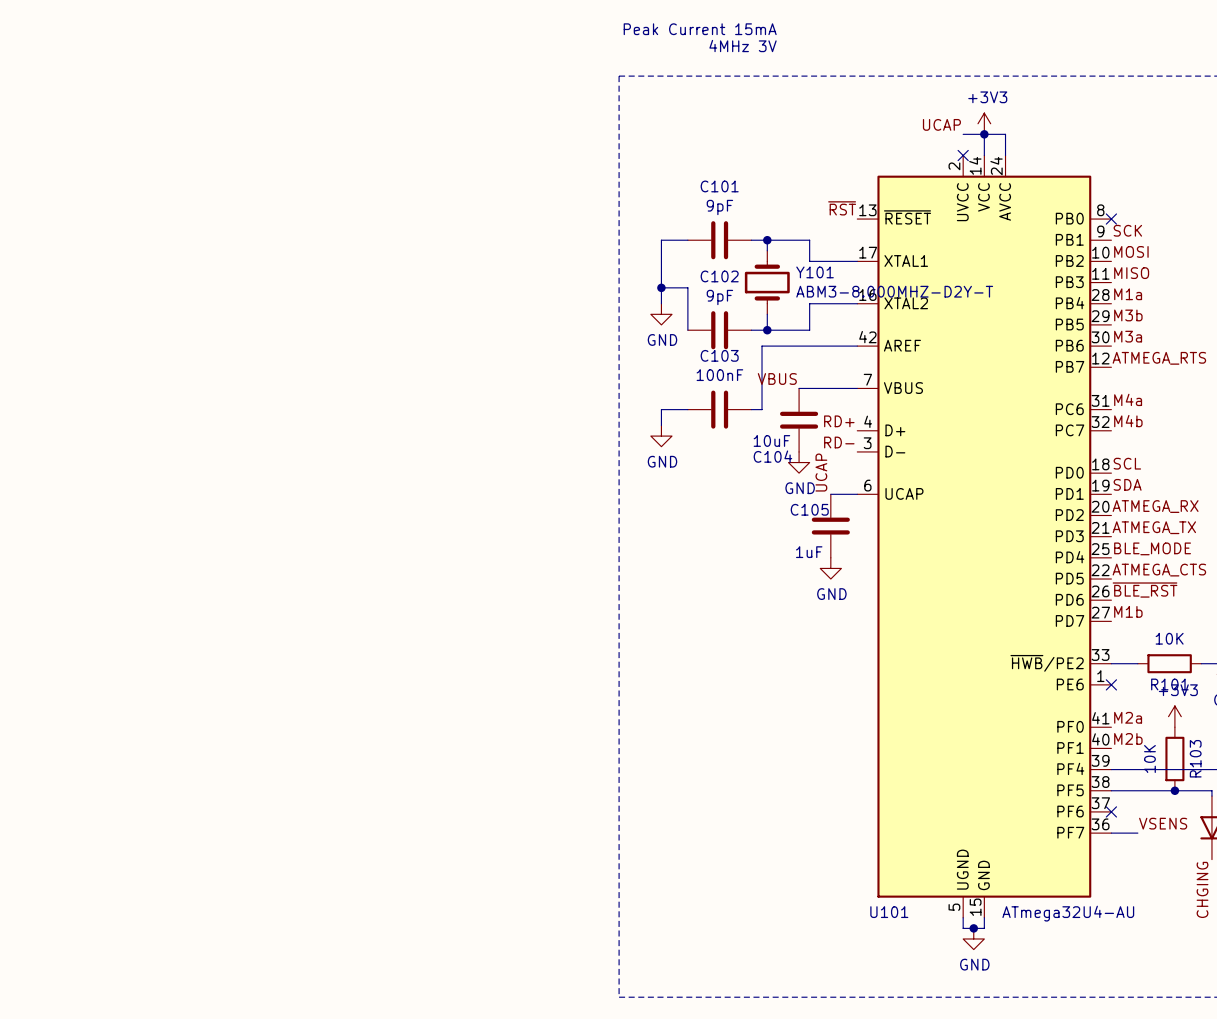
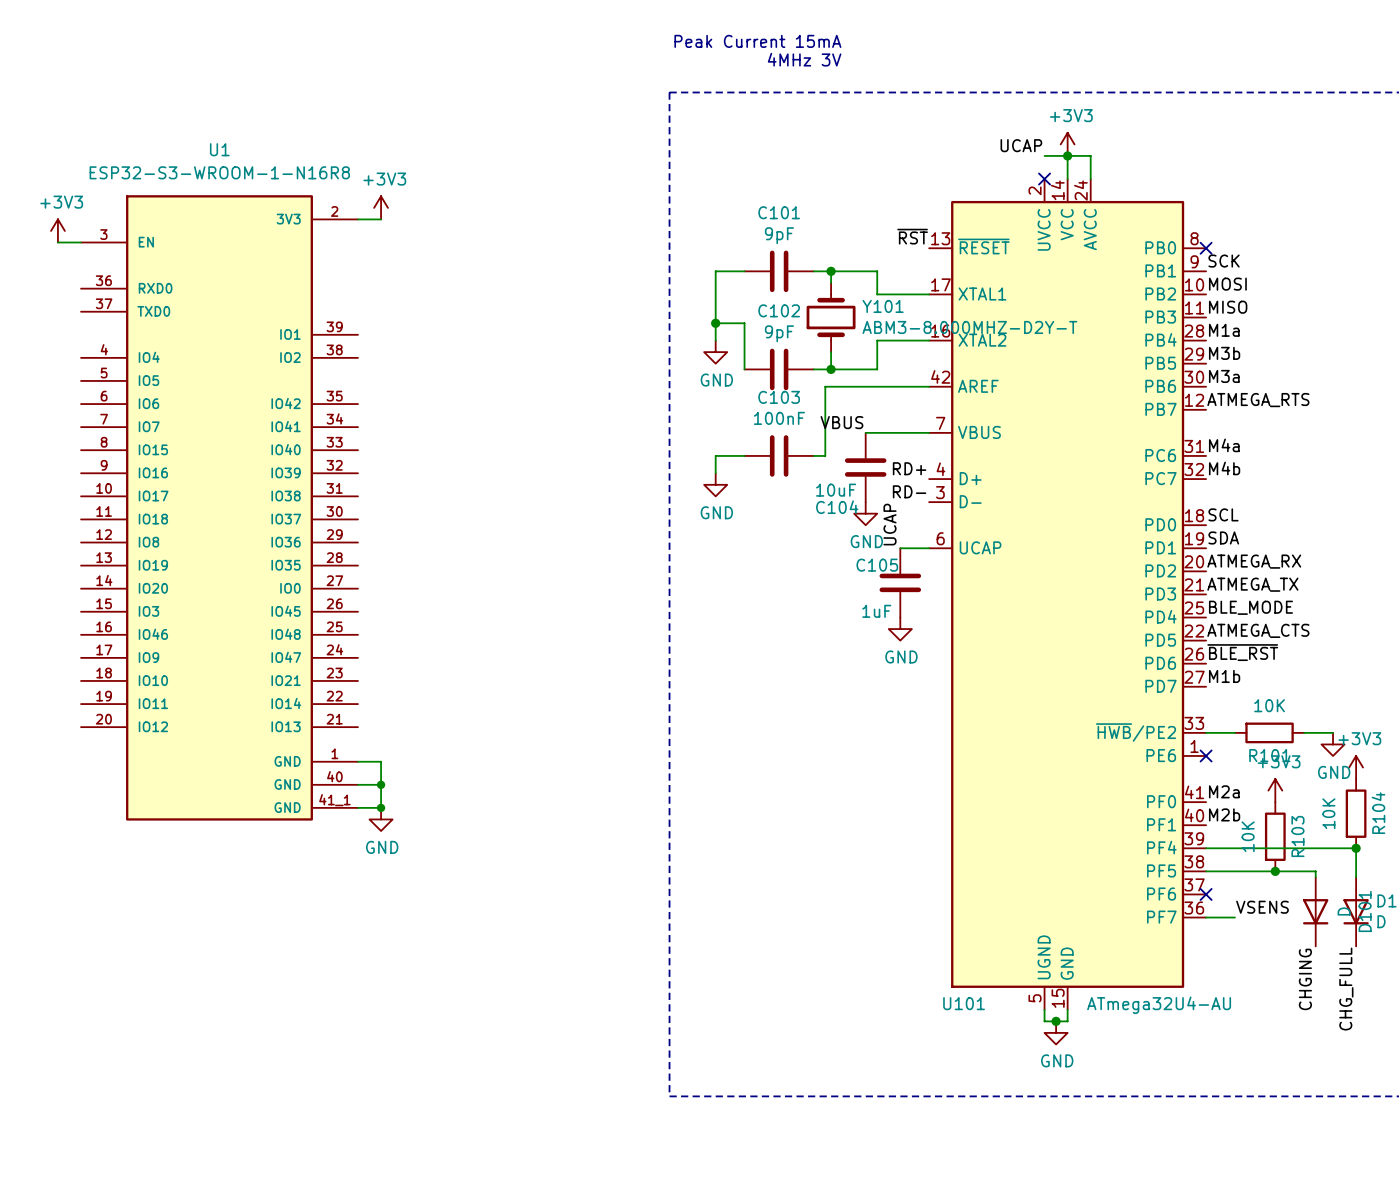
power symbol: none -> +3V3 (381, 207)
wire: none -> (357, 219) (381, 219)
power symbol: none -> +3V3 (57, 230)
wire: none -> (57, 242) (81, 242)
U1: none -> ESP32-S3-WROOM-1-N16R8 (219, 507)
wire: none -> (357, 761) (381, 761) (381, 807) (357, 807)
wire: none -> (357, 784) (381, 784)
junction: none -> (381, 784)
junction: none -> (381, 807)
power symbol: none -> GND (381, 819)

